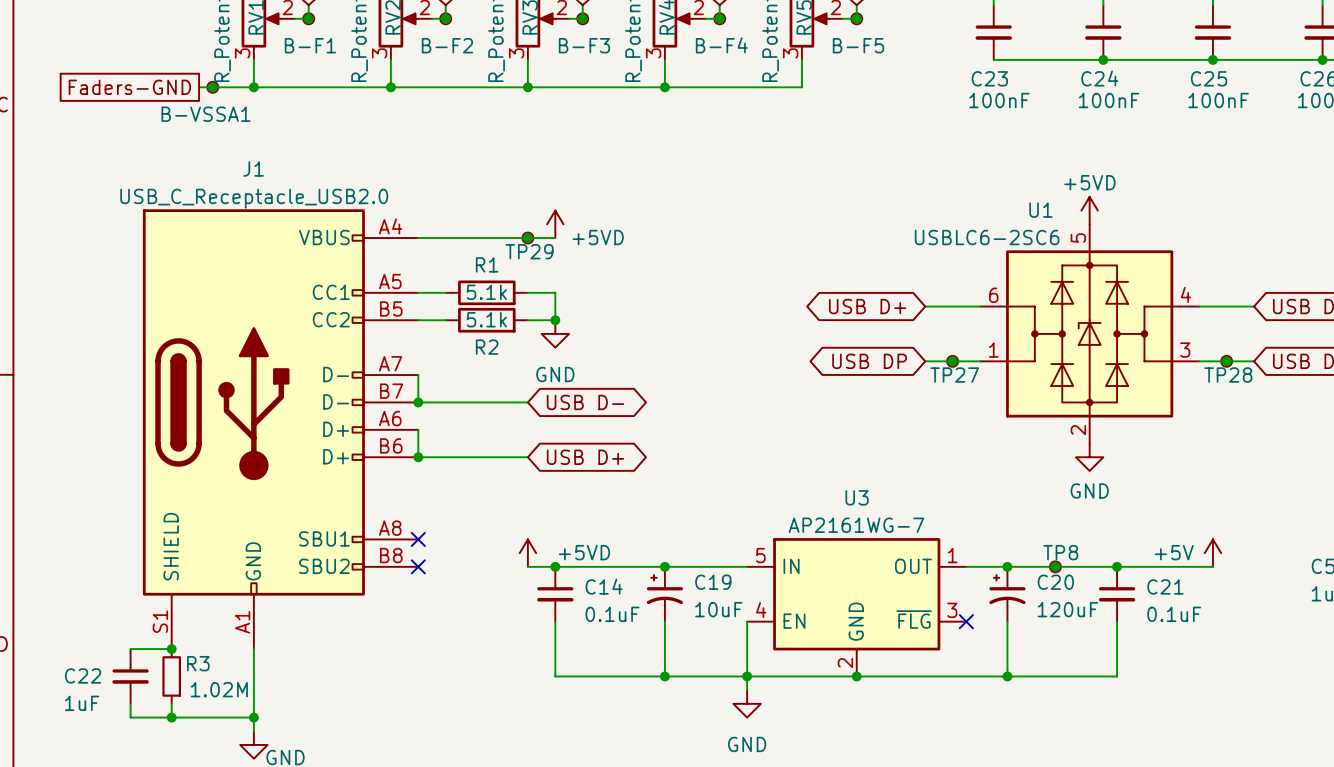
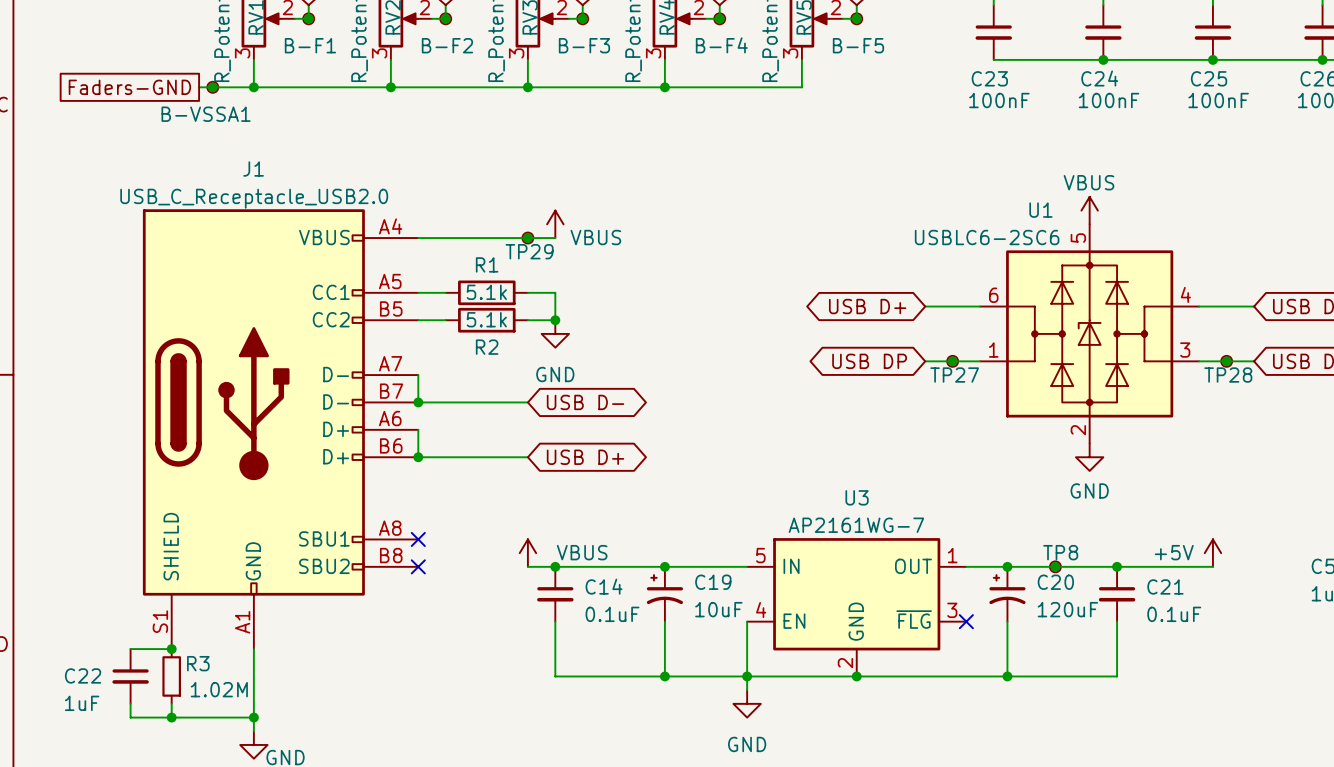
power symbol: +5VD (1089, 210) -> VBUS (1089, 210)
power symbol: +5VD (555, 224) -> VBUS (555, 224)
power symbol: +5VD (527, 553) -> VBUS (527, 553)

